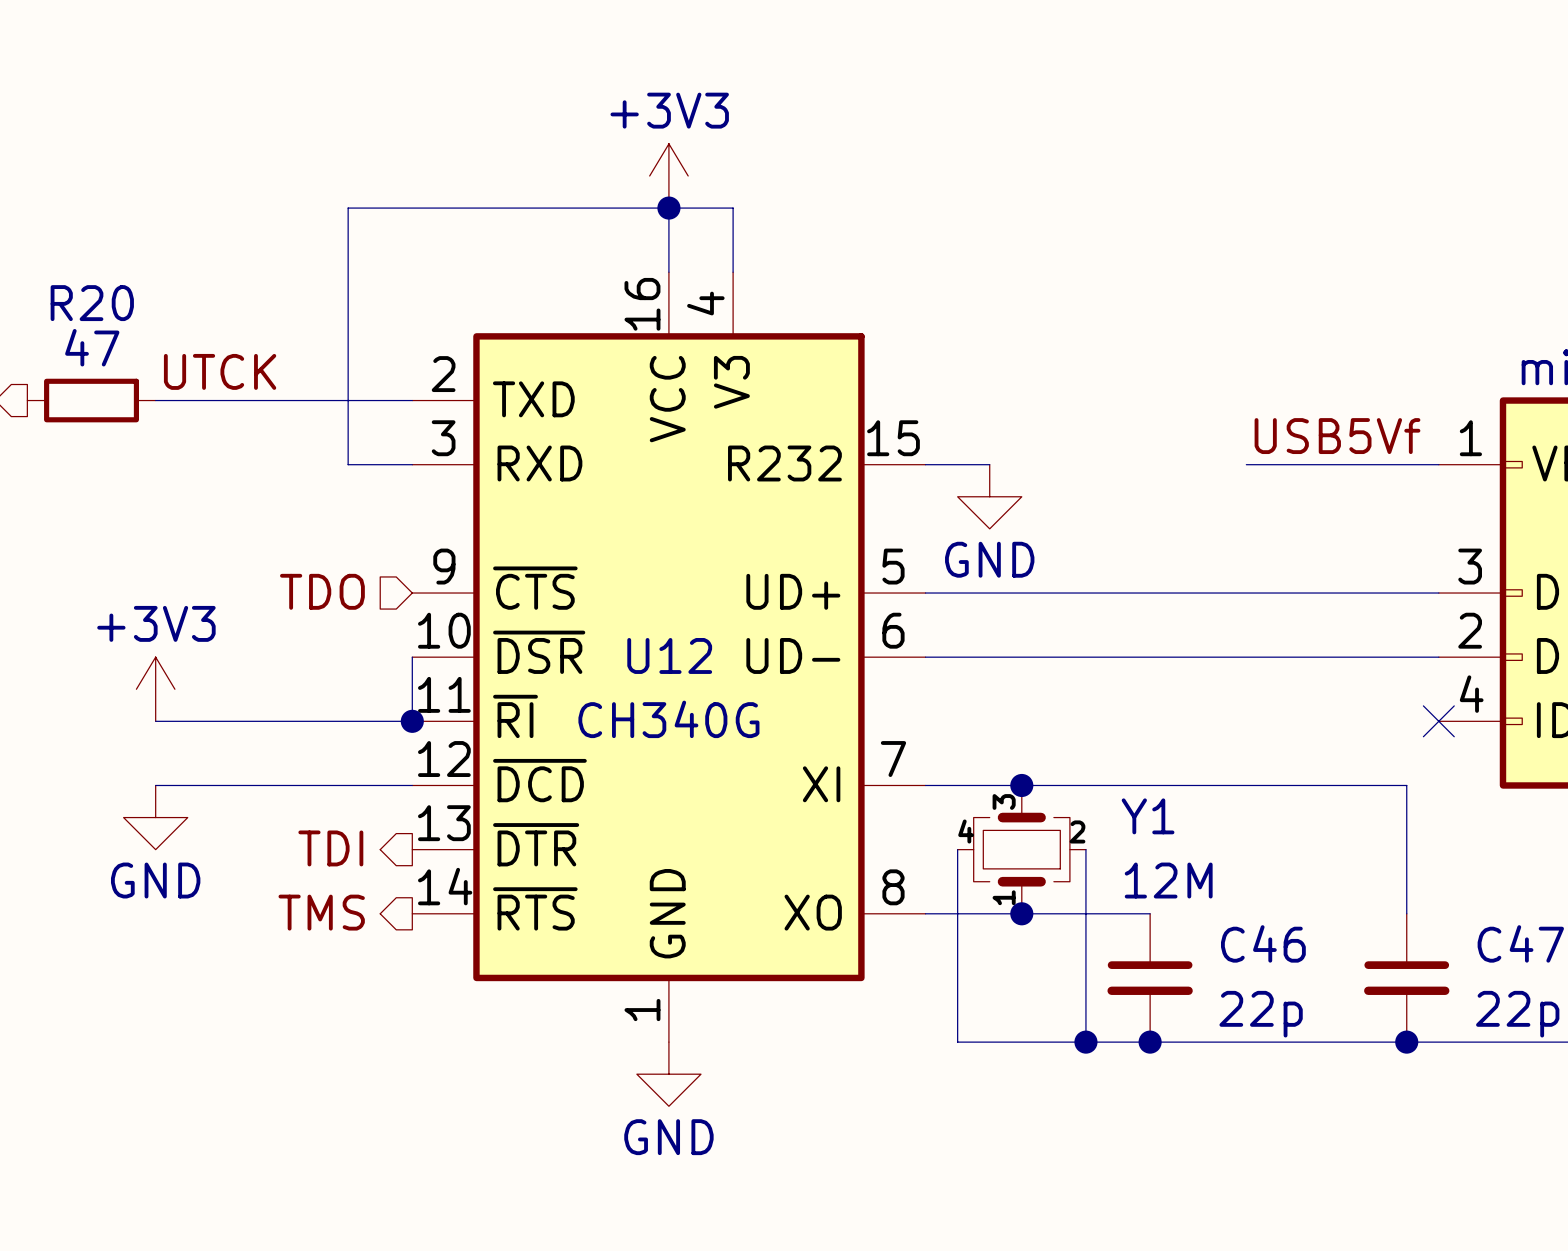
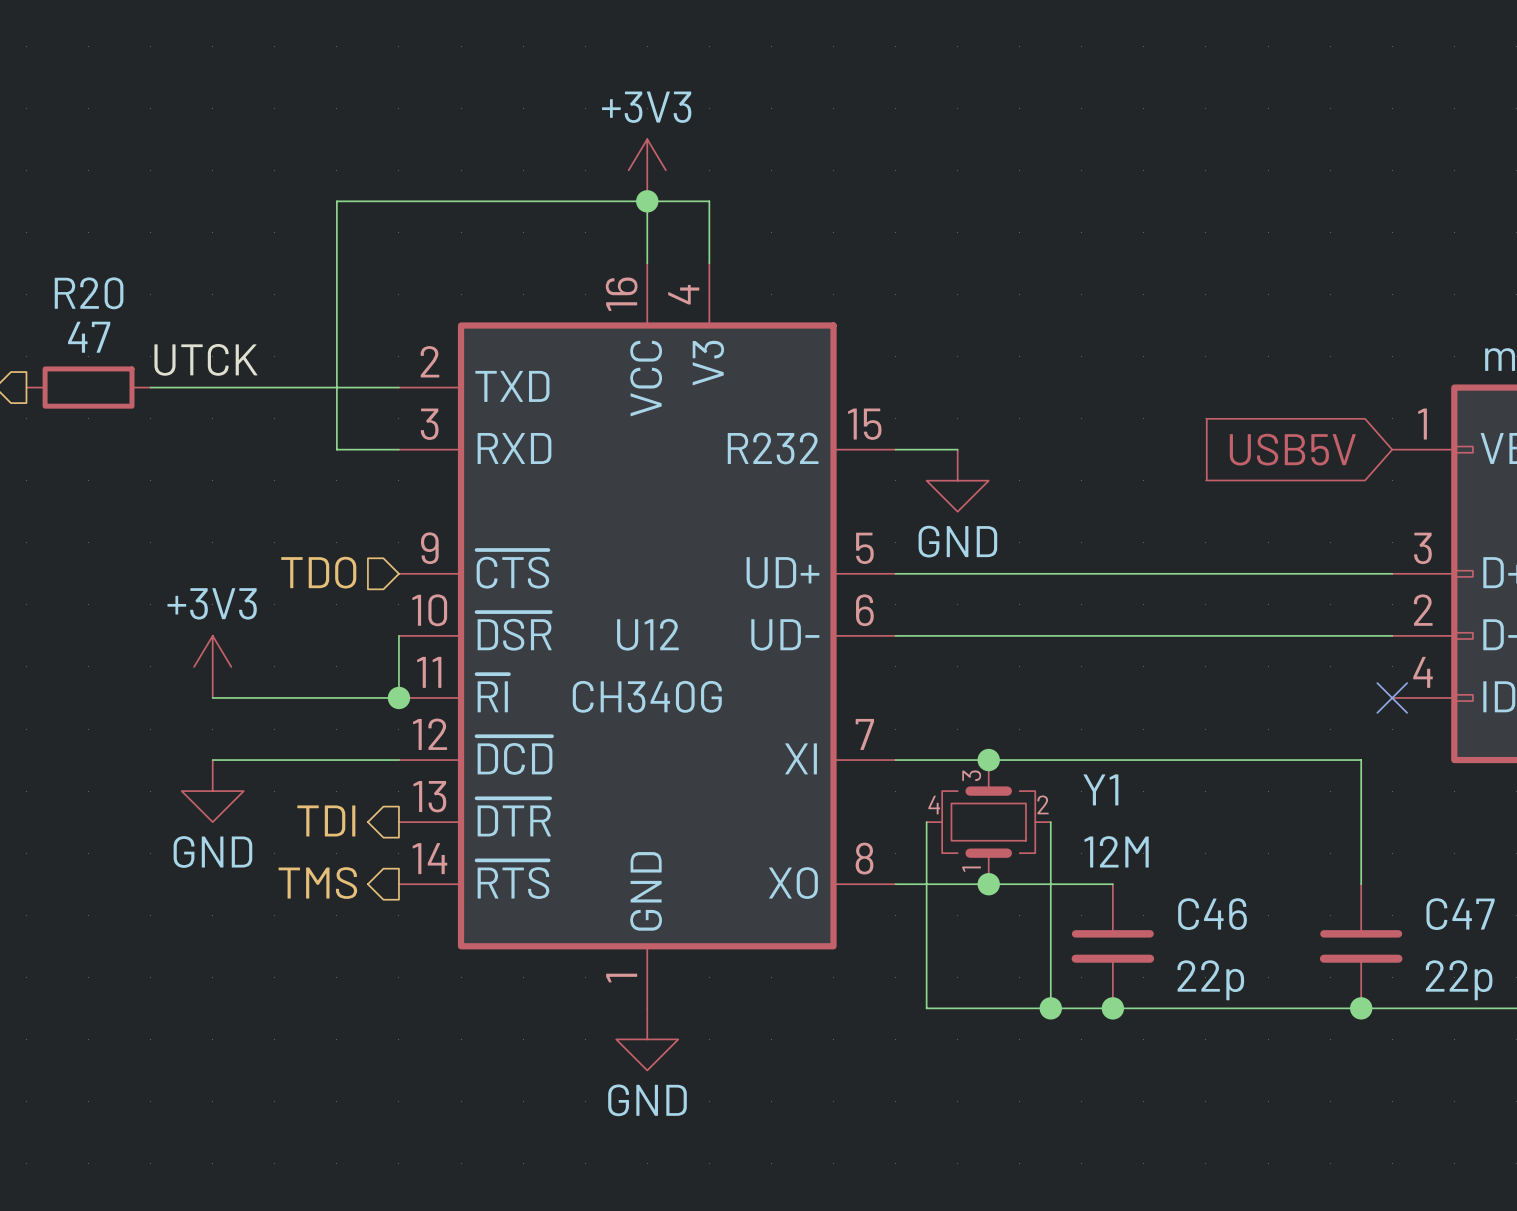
label: USB5Vf (1337, 436) -> none
wire: (1246, 464) (1438, 464) -> none
global label: none -> USB5V (1292, 449)
power symbol position: +3V3 (155, 689) -> +3V3 (212, 666)
wire: (155, 721) (219, 721) -> none
wire: (155, 785) (219, 785) -> none
power symbol position: GND (155, 817) -> GND (212, 791)

